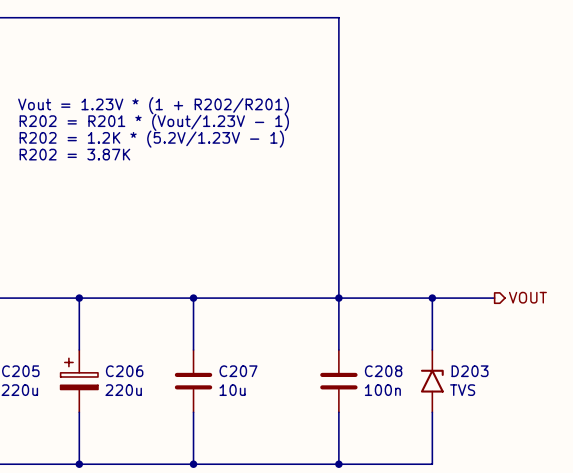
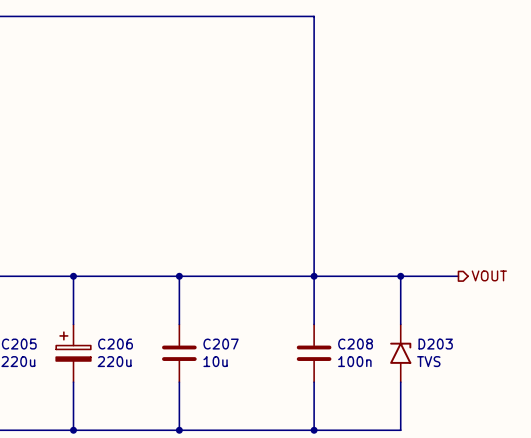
text: Vout = 1.23V * (1 + R202/R201) (153, 105) -> none
text: R202 = R201 * (Vout/1.23V - 1) (154, 122) -> none
text: R202 = 1.2K * (5.2V/1.23V - 1) (151, 139) -> none
text: R202 = 3.87K (74, 154) -> none

